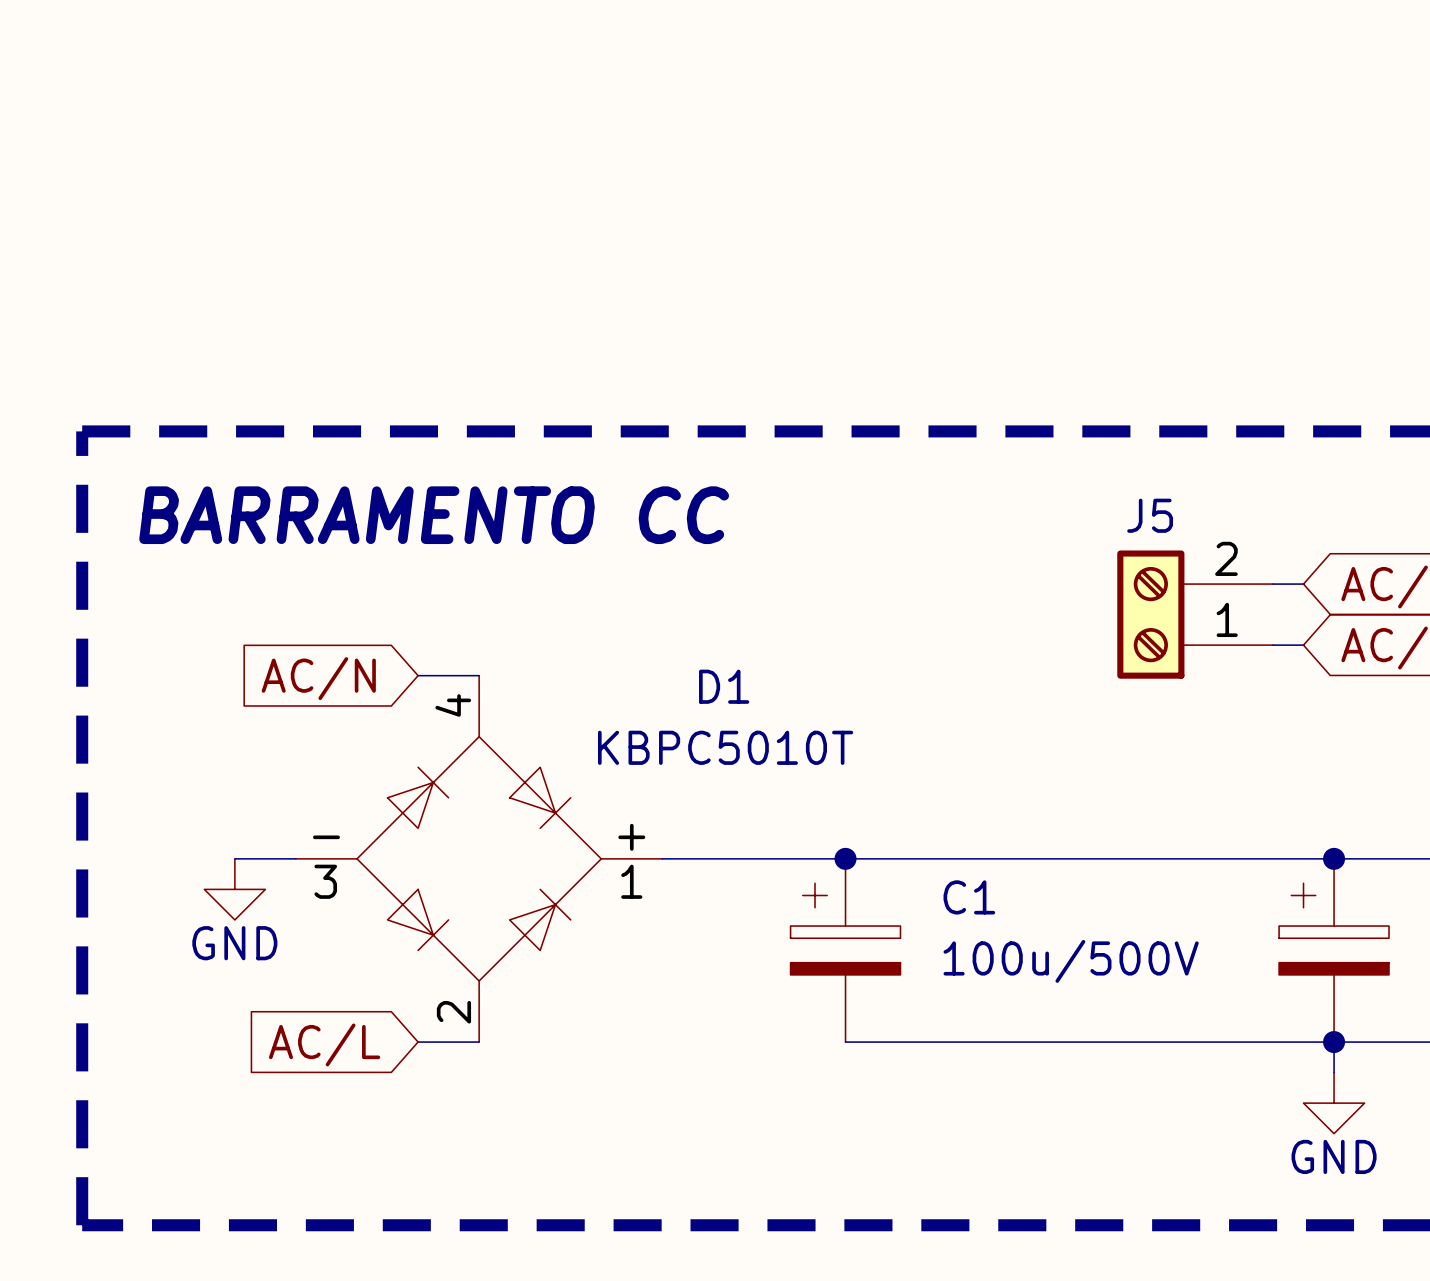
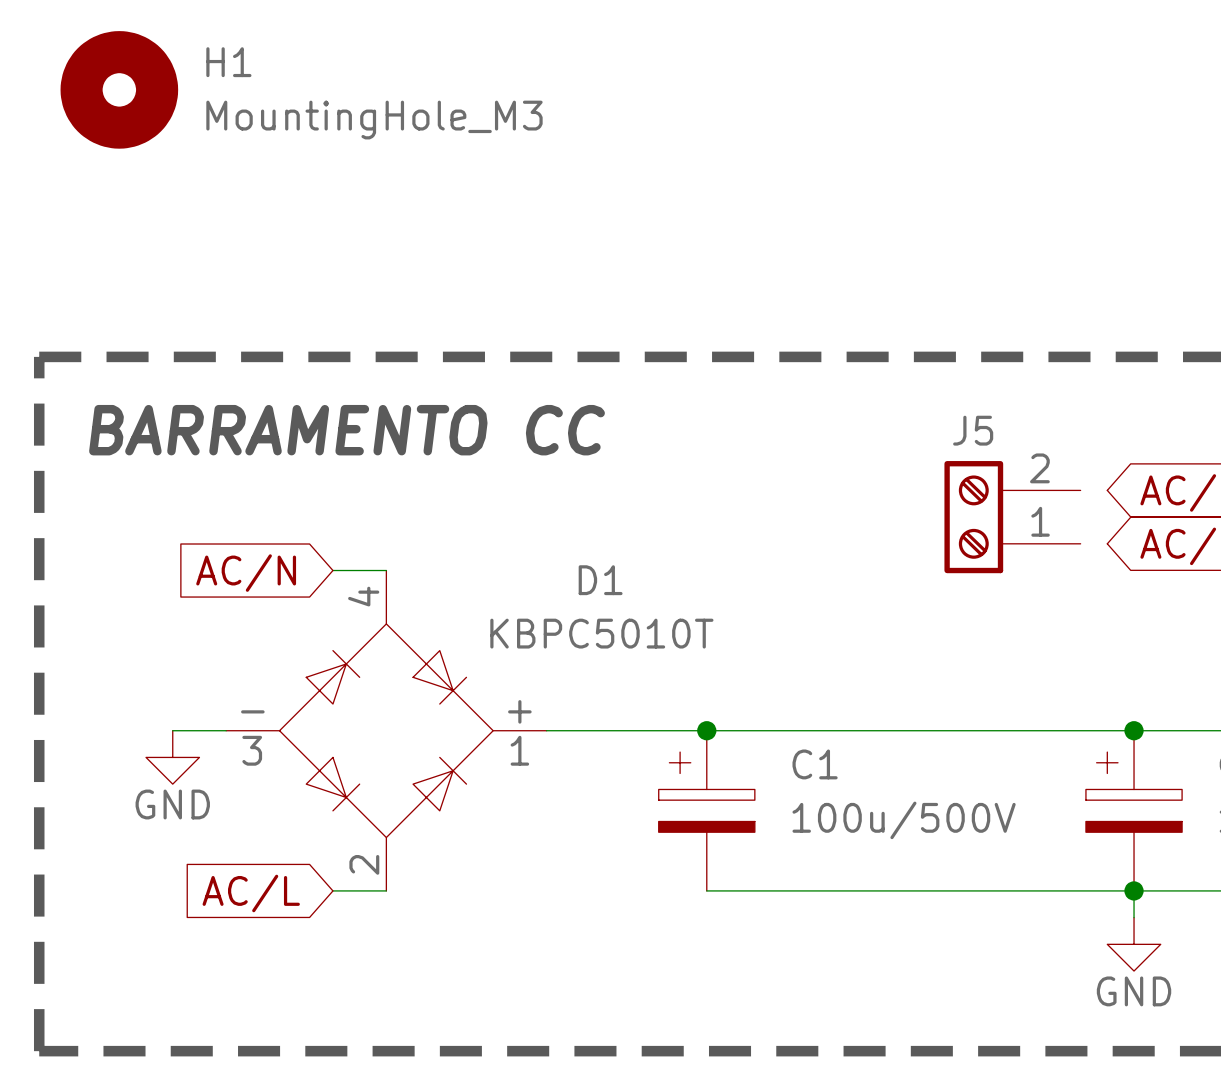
H1: none -> MountingHole_M3 (119, 89)
wire: (1272, 584) (1303, 584) -> none
wire: (1272, 645) (1303, 645) -> none

